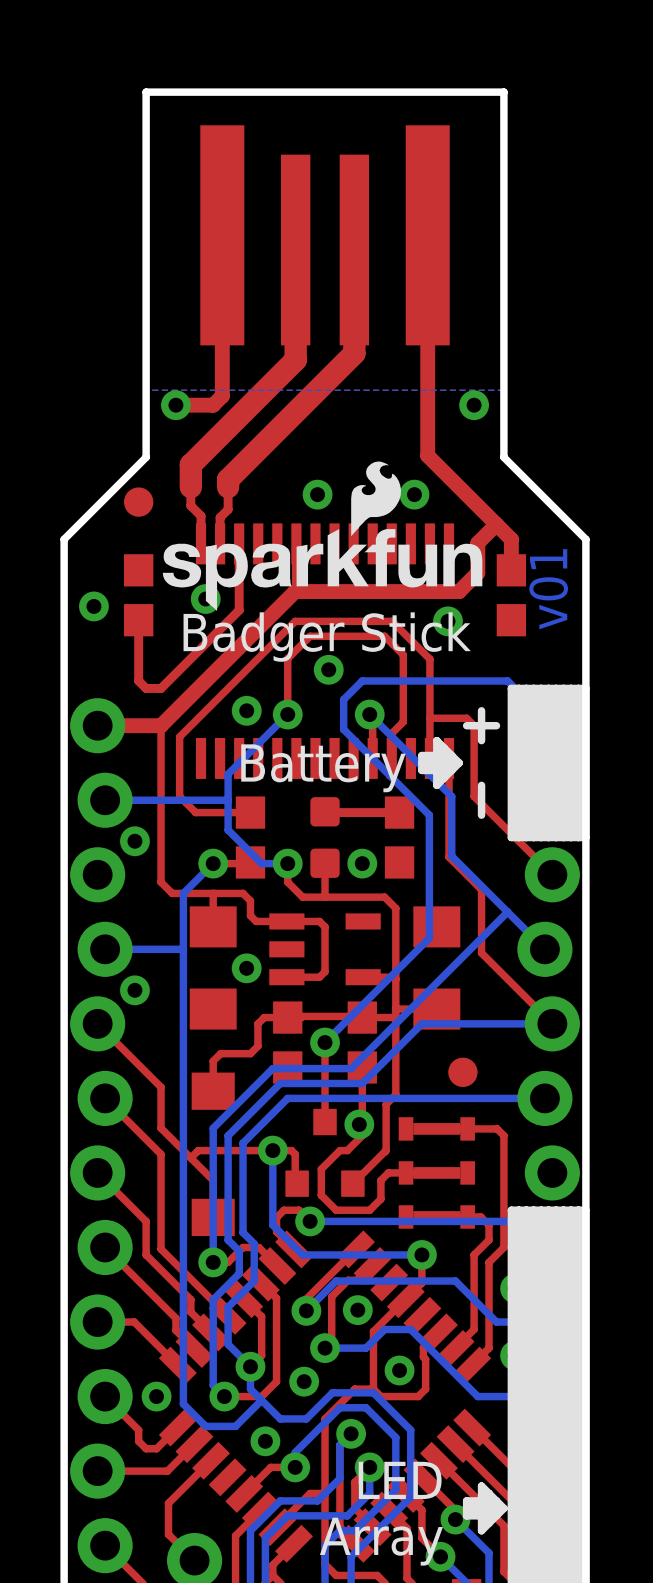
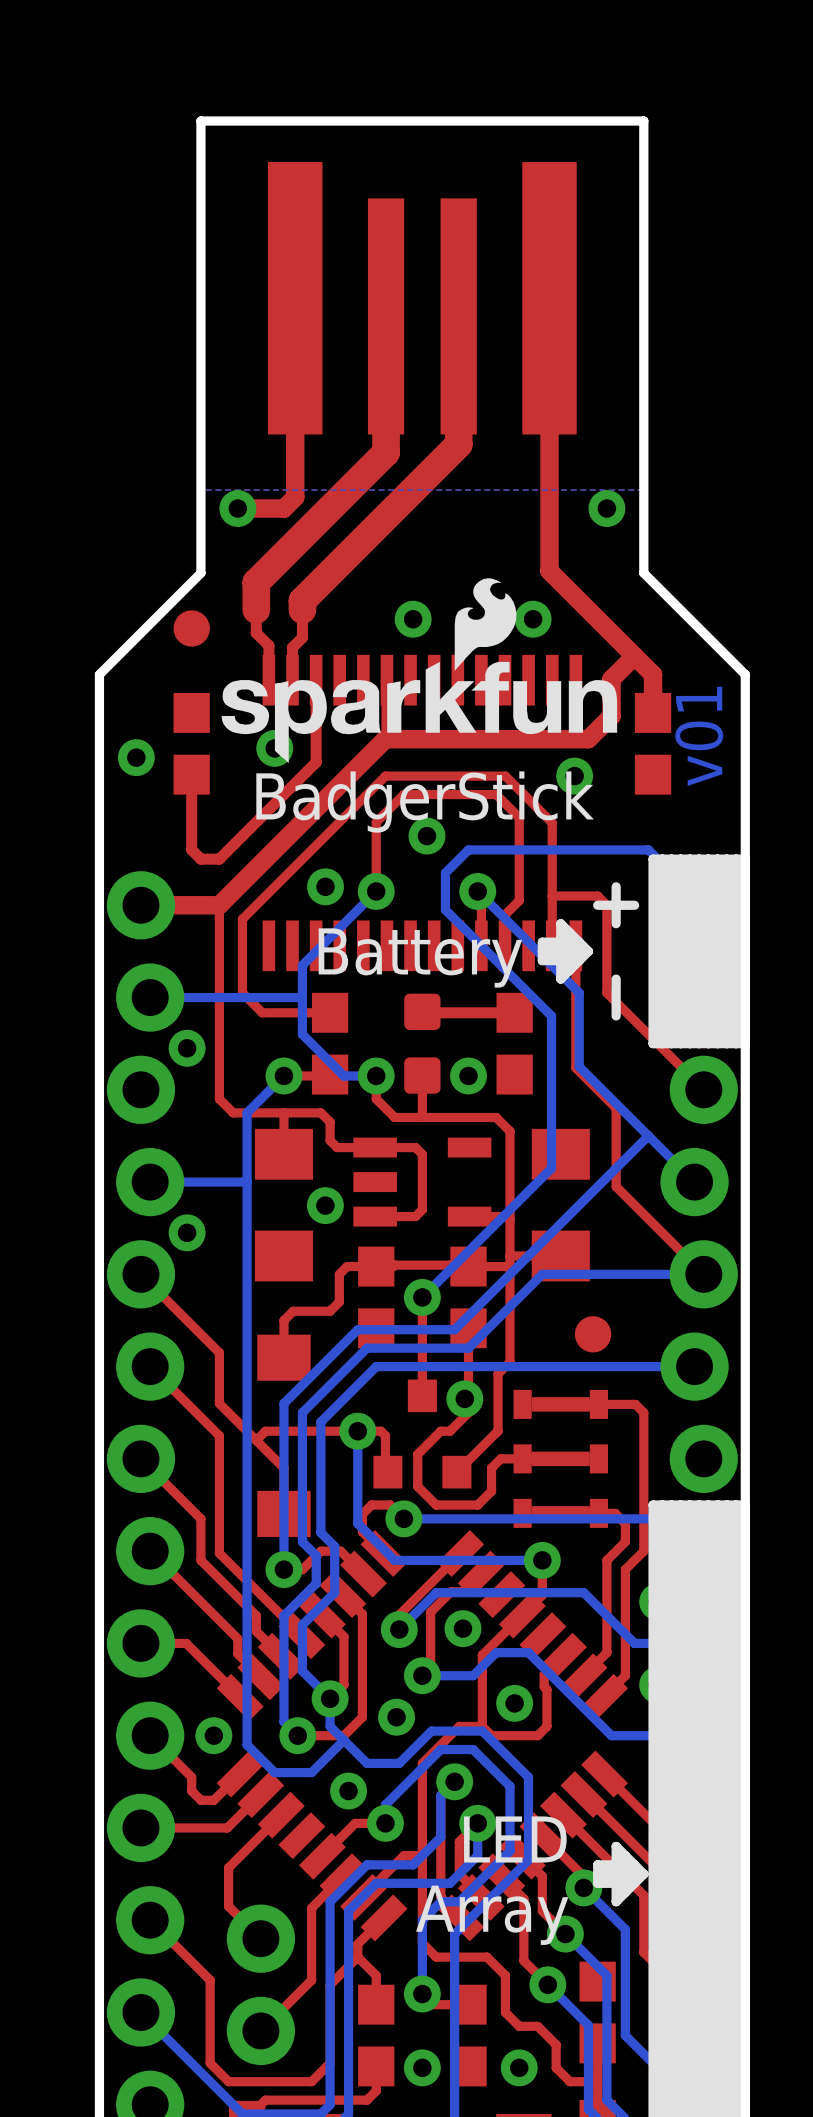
text: Badger Stick (327, 637) -> BadgerStick (425, 802)

